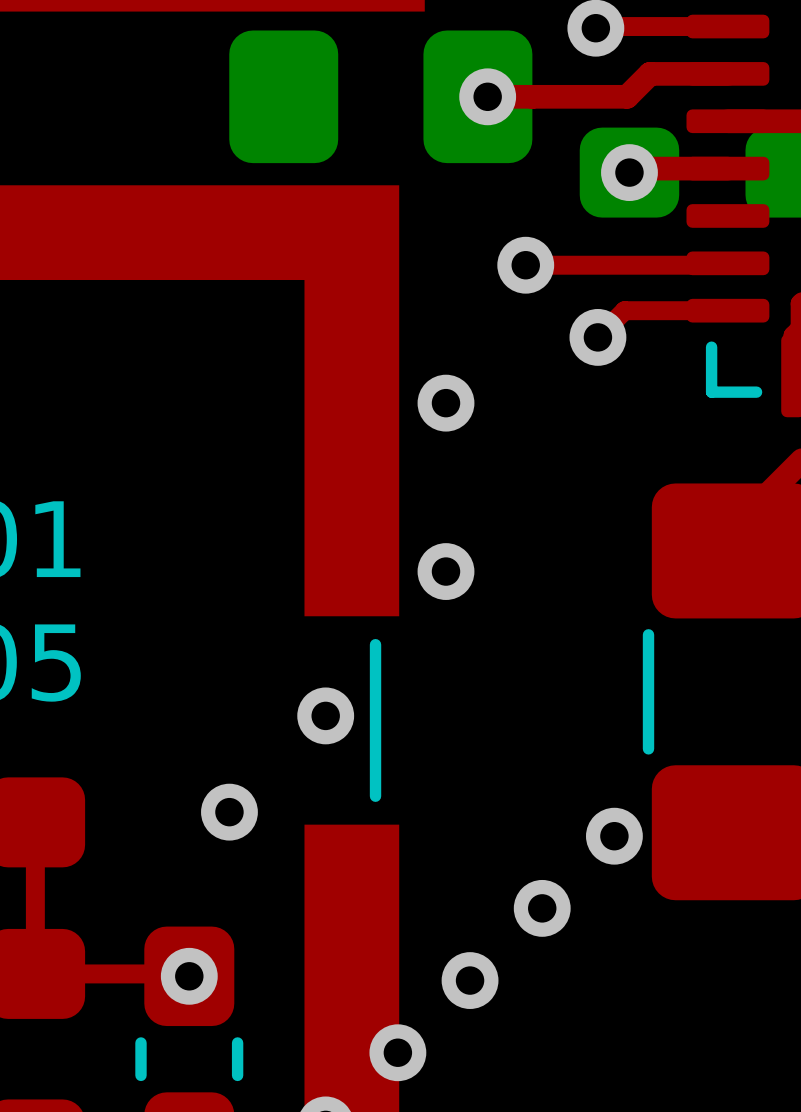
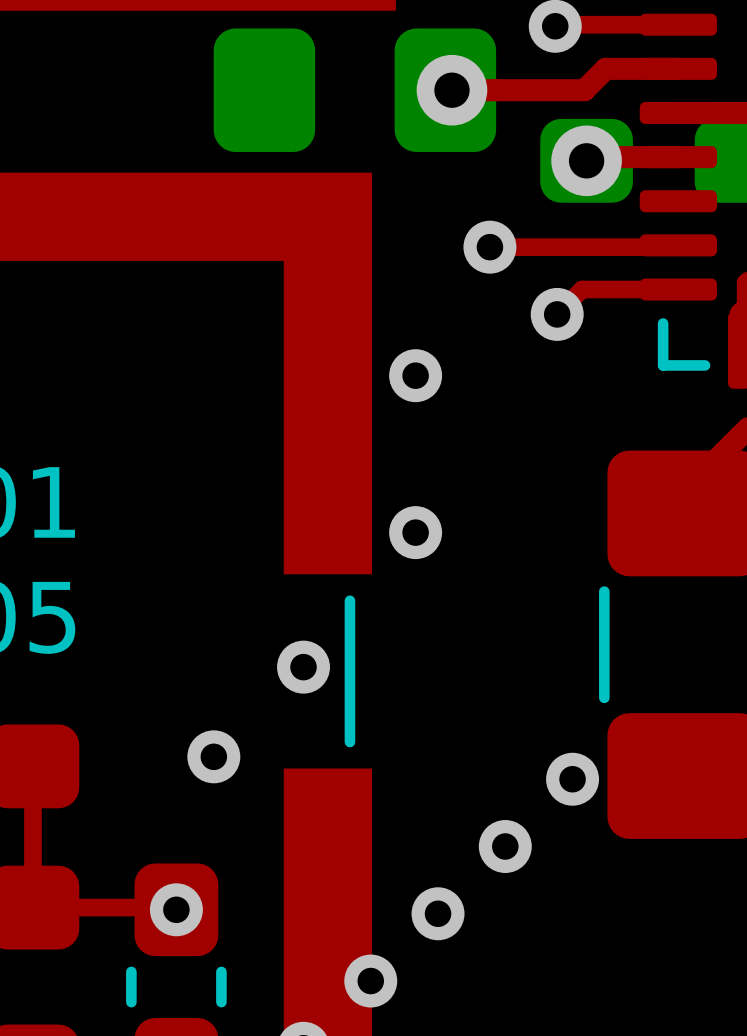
via size: [459, 68, 517, 126] -> [416, 54, 488, 126]
via size: [601, 144, 658, 202] -> [551, 125, 622, 197]

